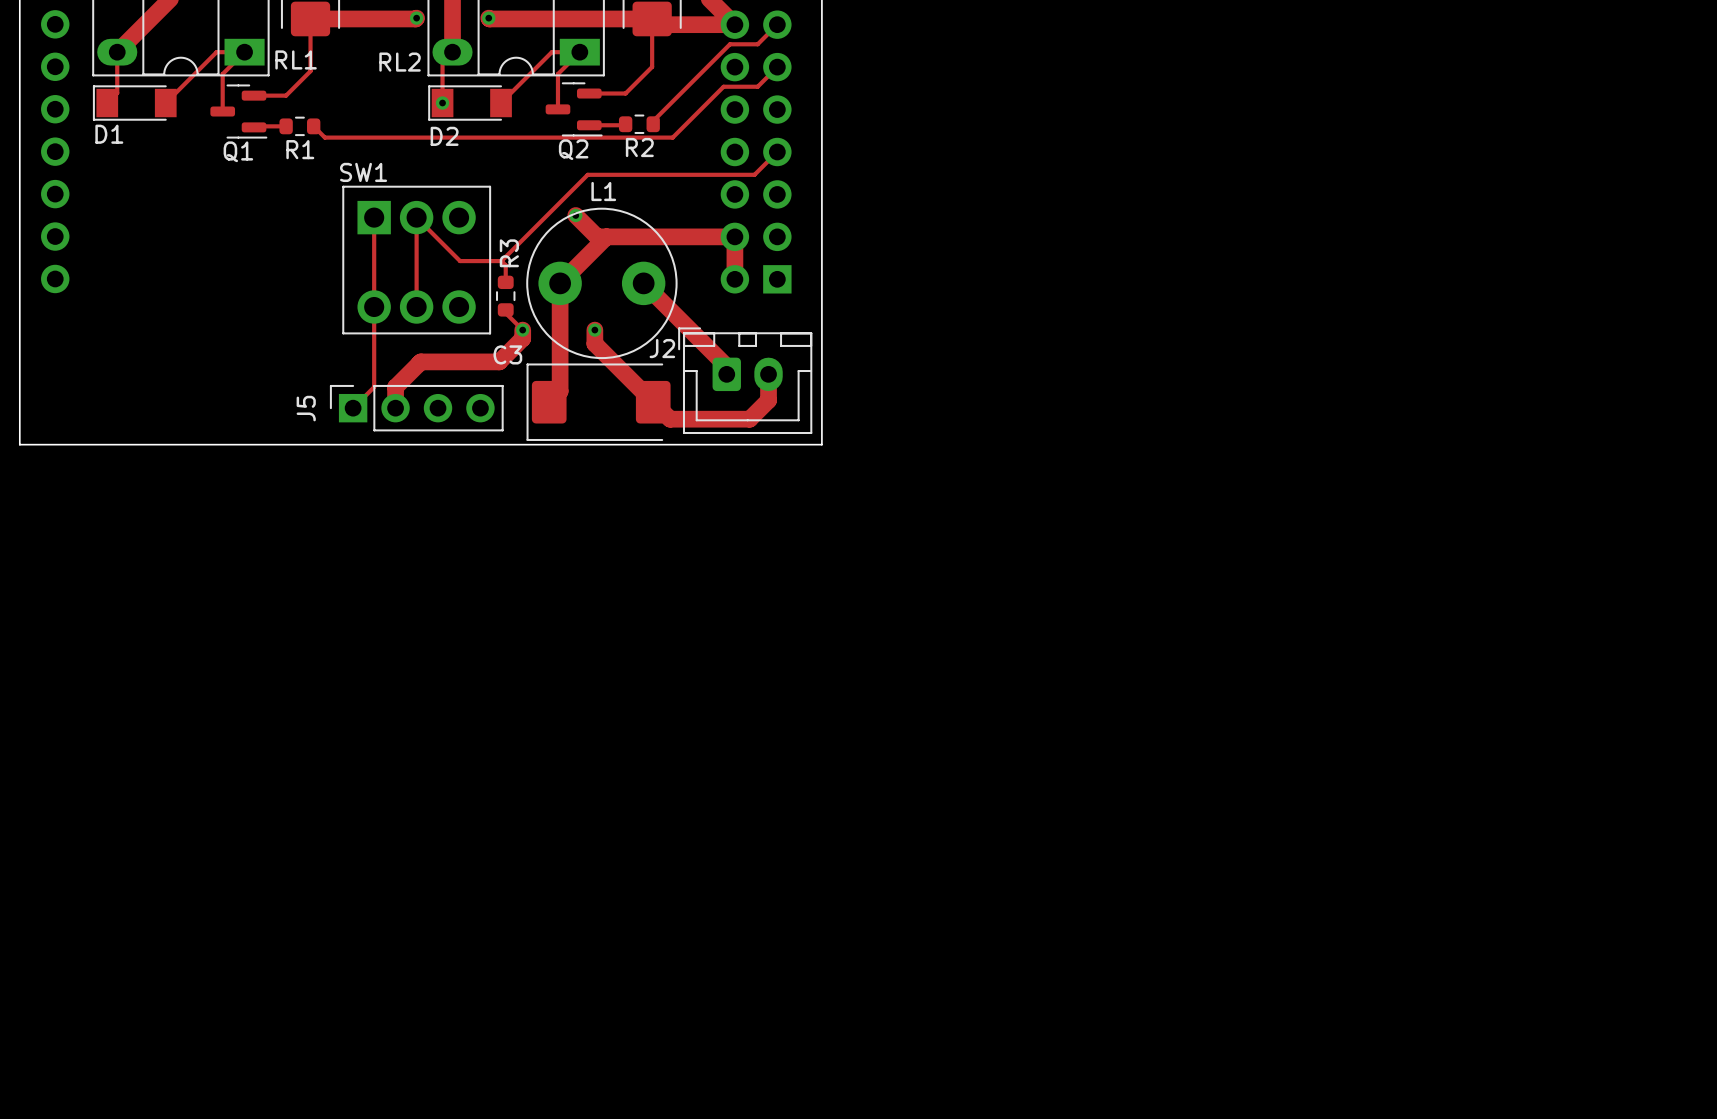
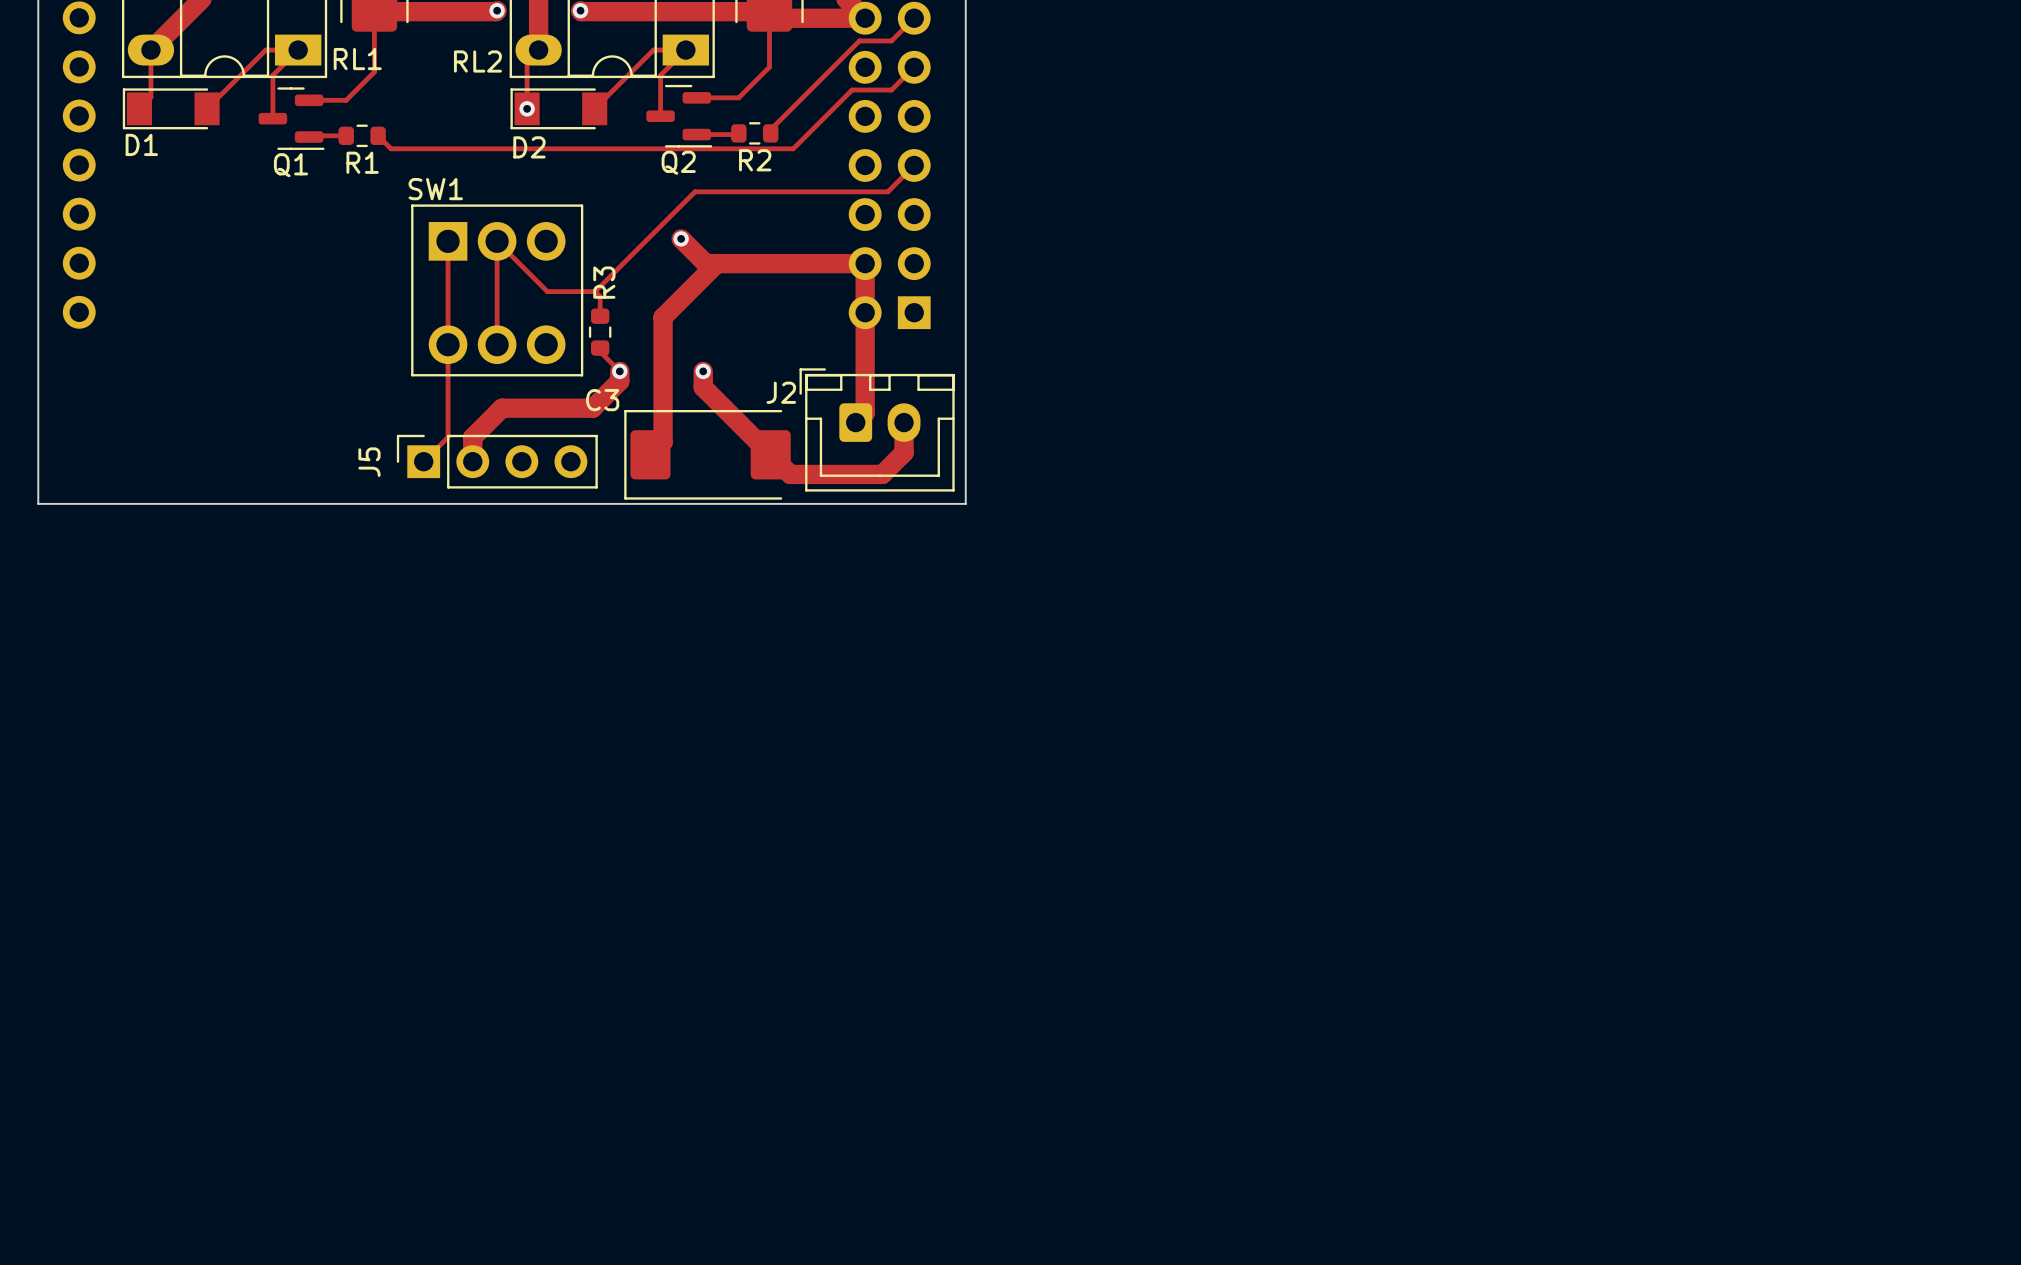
track: none -> (865, 312) (865, 413) (855, 422)
L1: (601, 283) -> none
track: (643, 283) (726, 366) -> none

